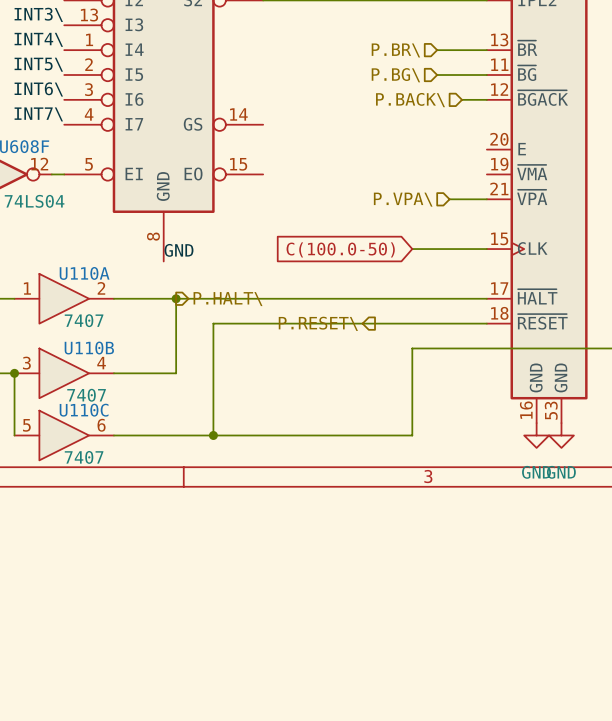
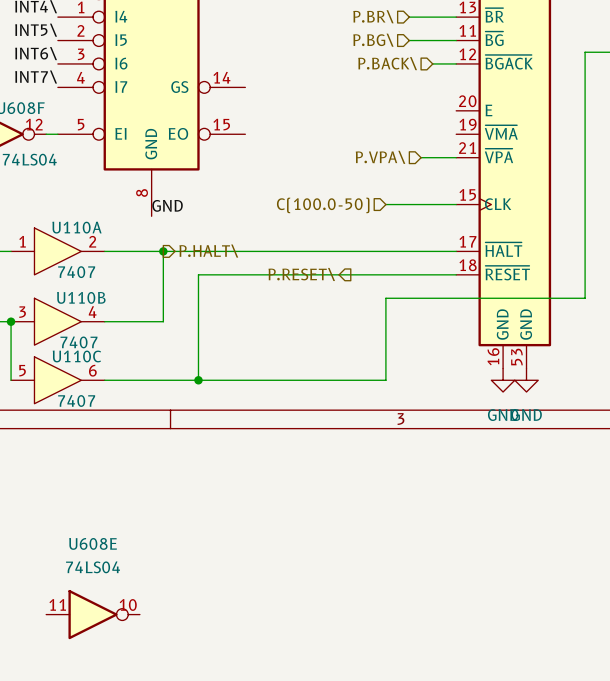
hierarchical label: none -> C(100.0-50) (323, 205)
global label: C(100.0-50) (340, 249) -> none
U608E: none -> 74LS04 (93, 614)

